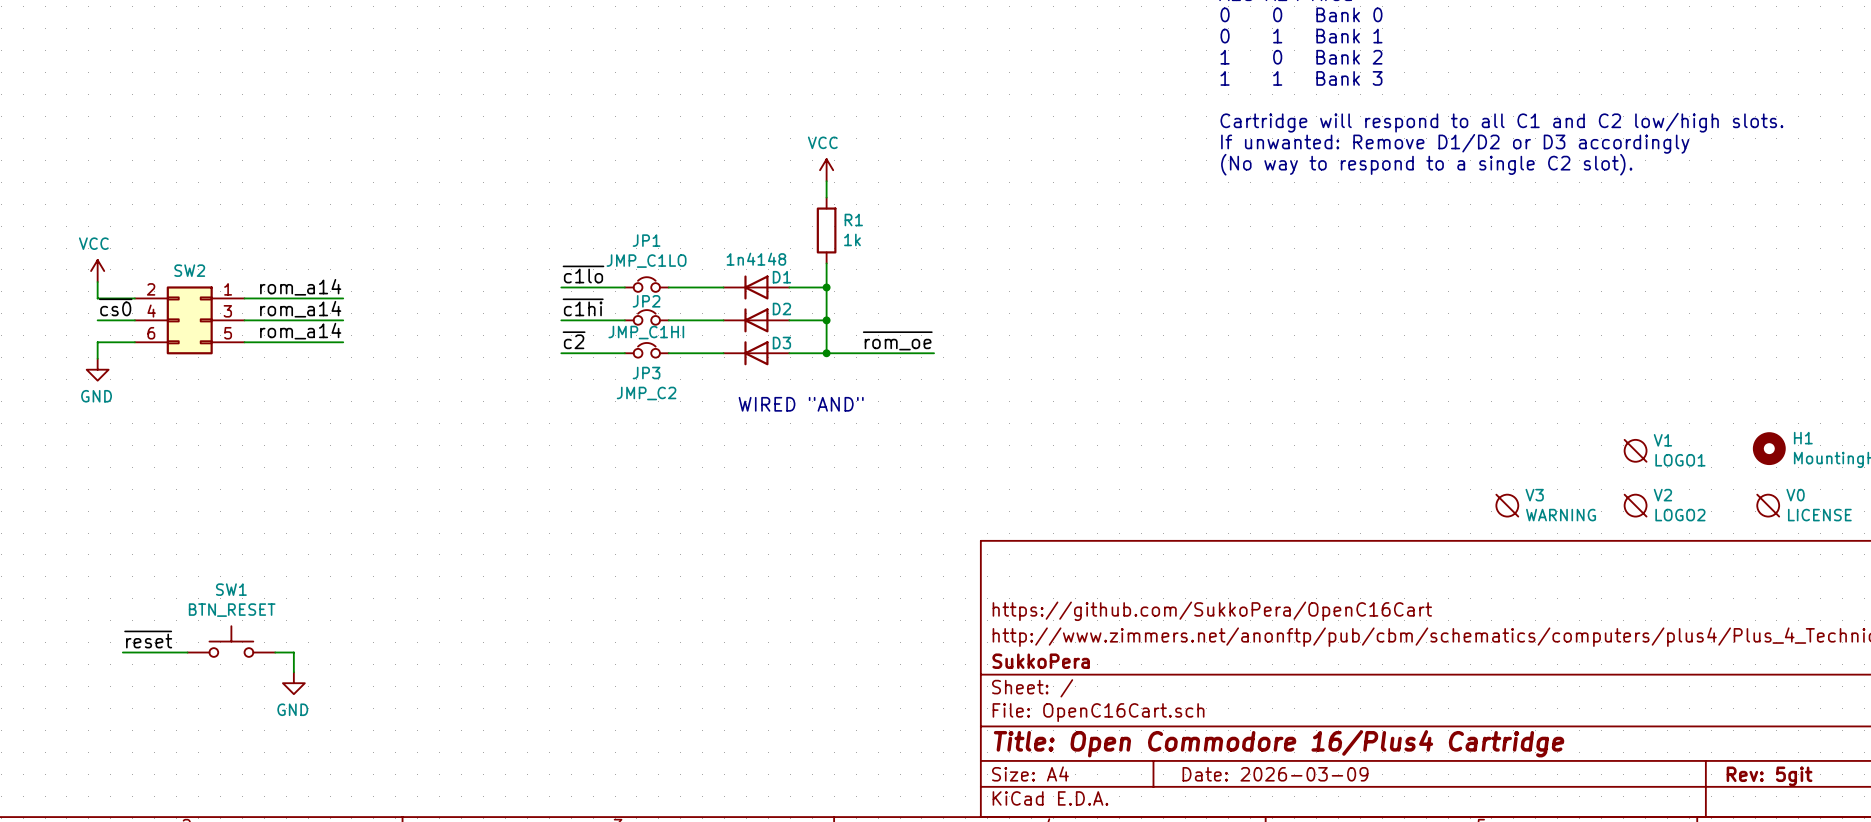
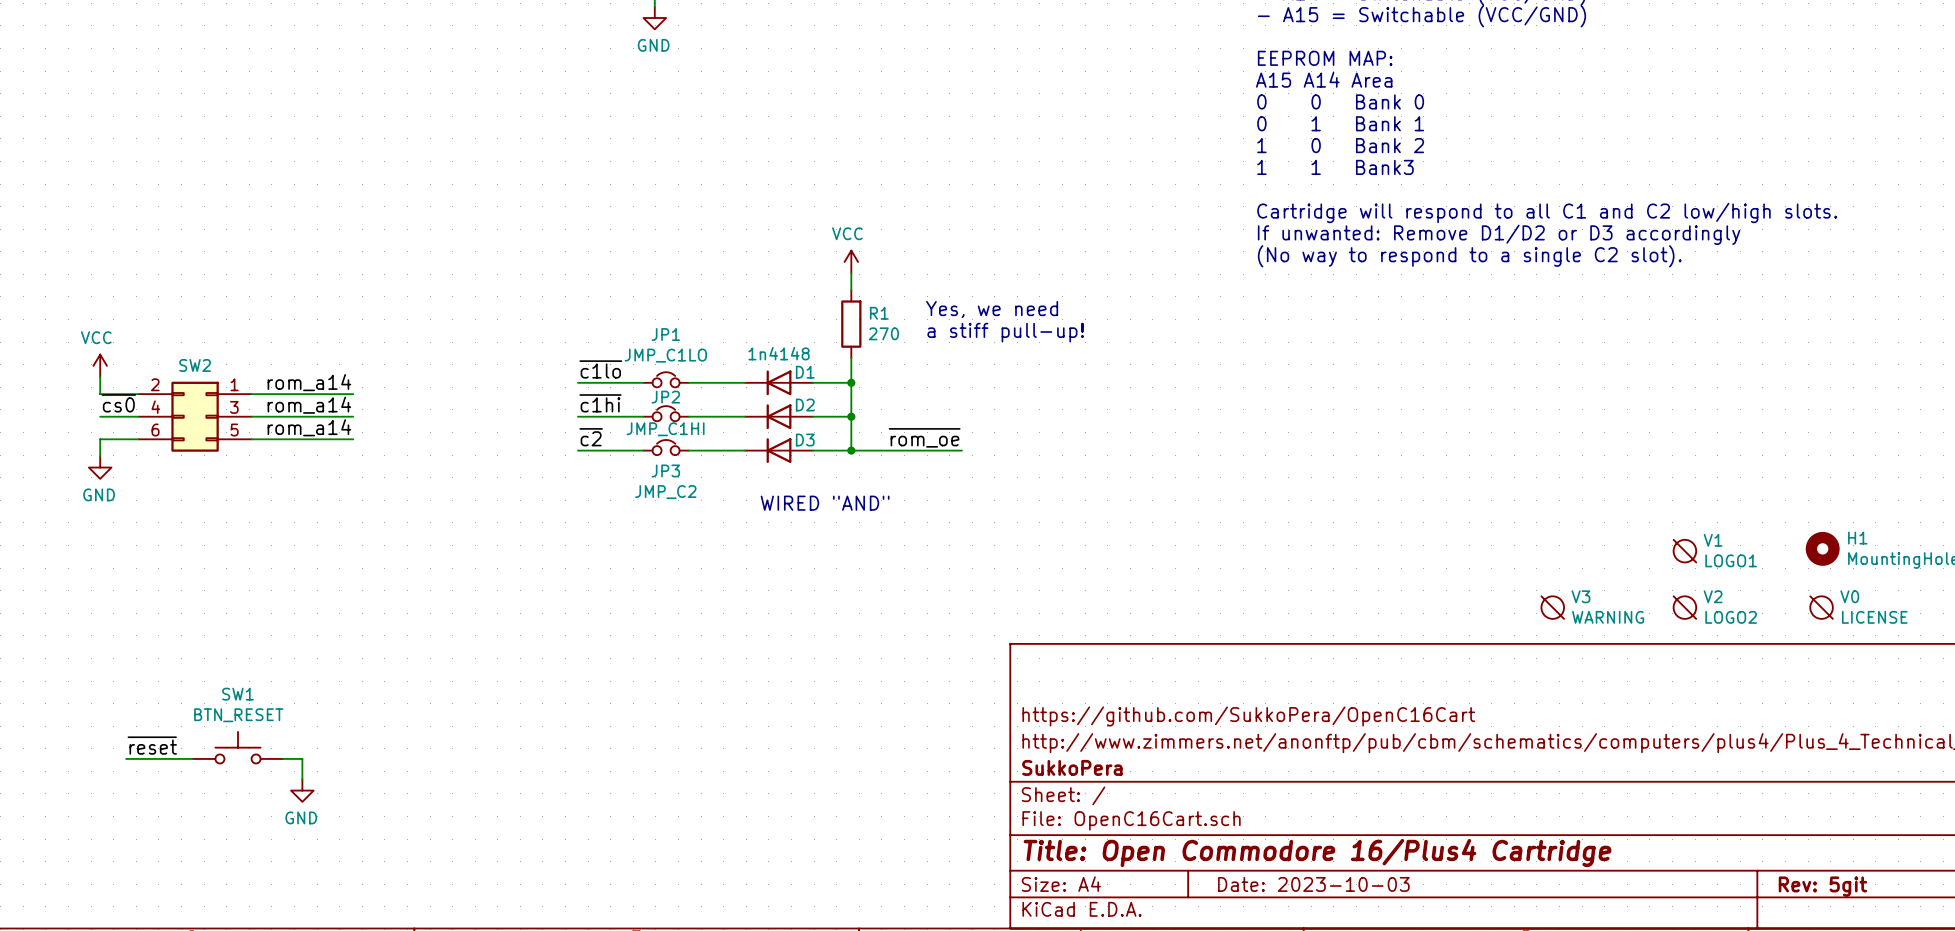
text: 1 1 Bank 3 (1301, 78) -> 1 1 Bank3 (1335, 167)
text: none -> Yes, we need (992, 309)
text: none -> a stiff pull-up! (1005, 332)
R1 value: 1k (852, 239) -> 270 (883, 333)
title block: Date: 2026-03-09 (1275, 774) -> Date: 2023-10-03 (1313, 884)

